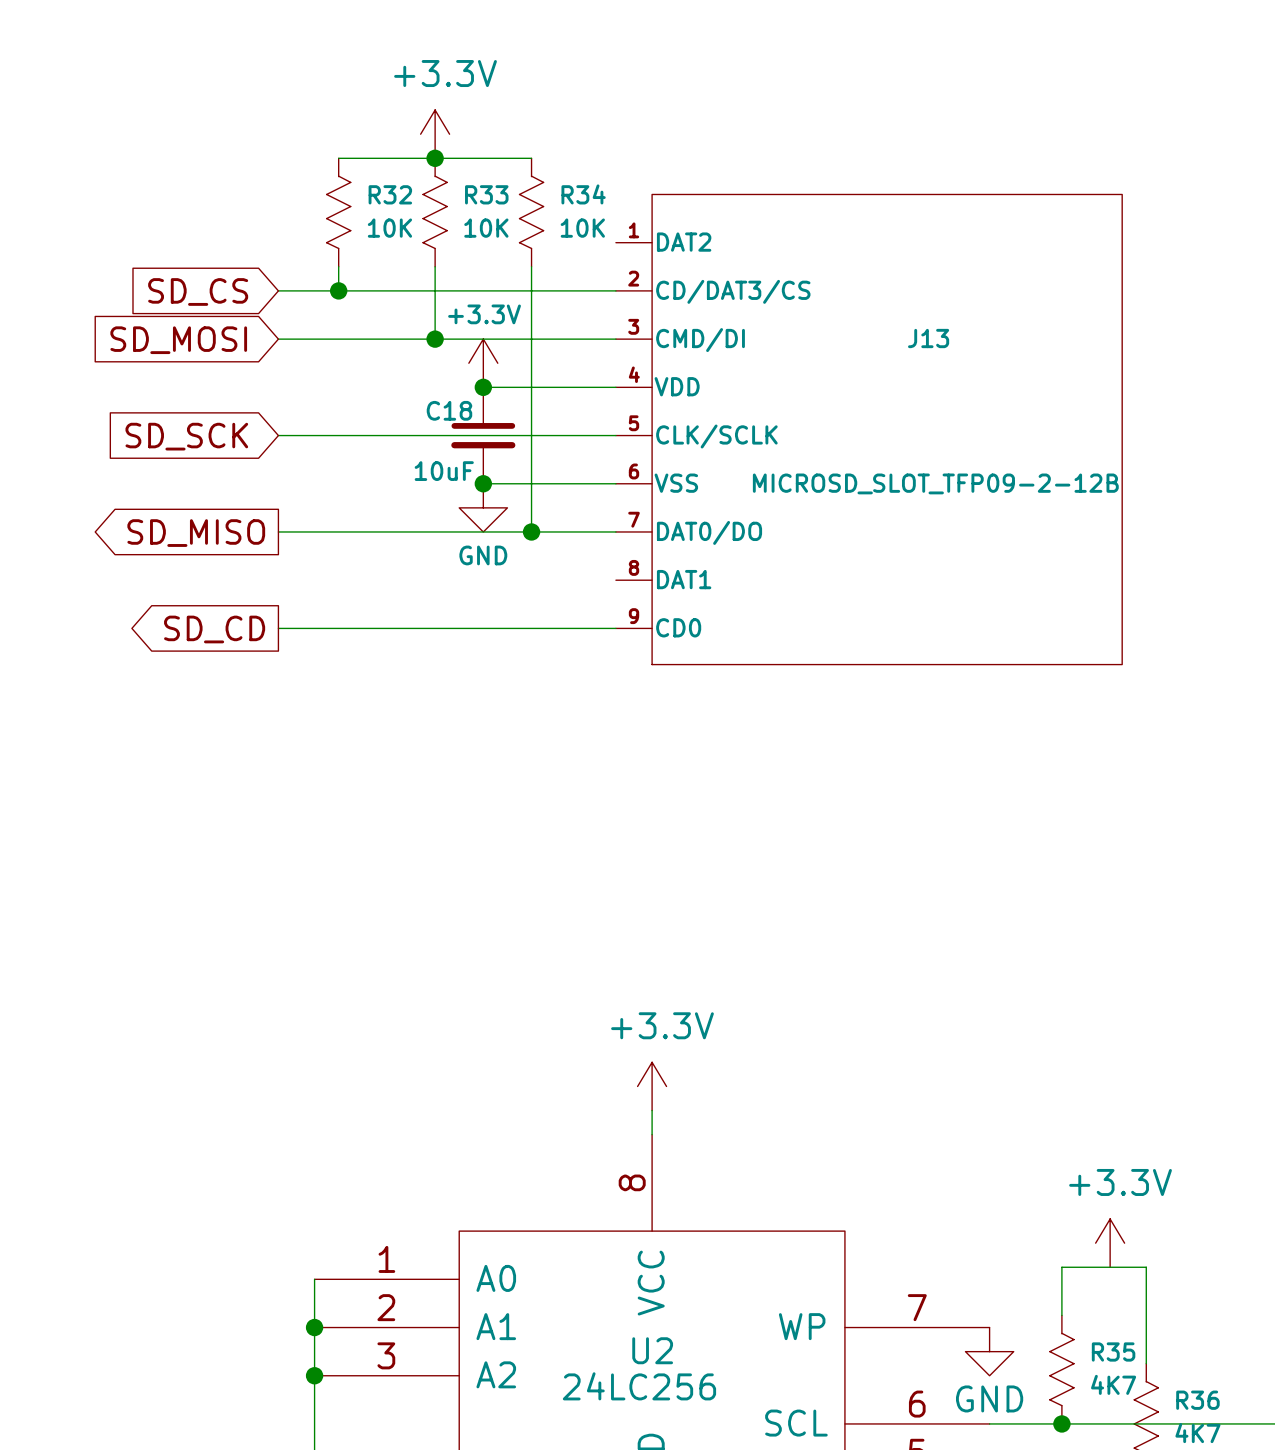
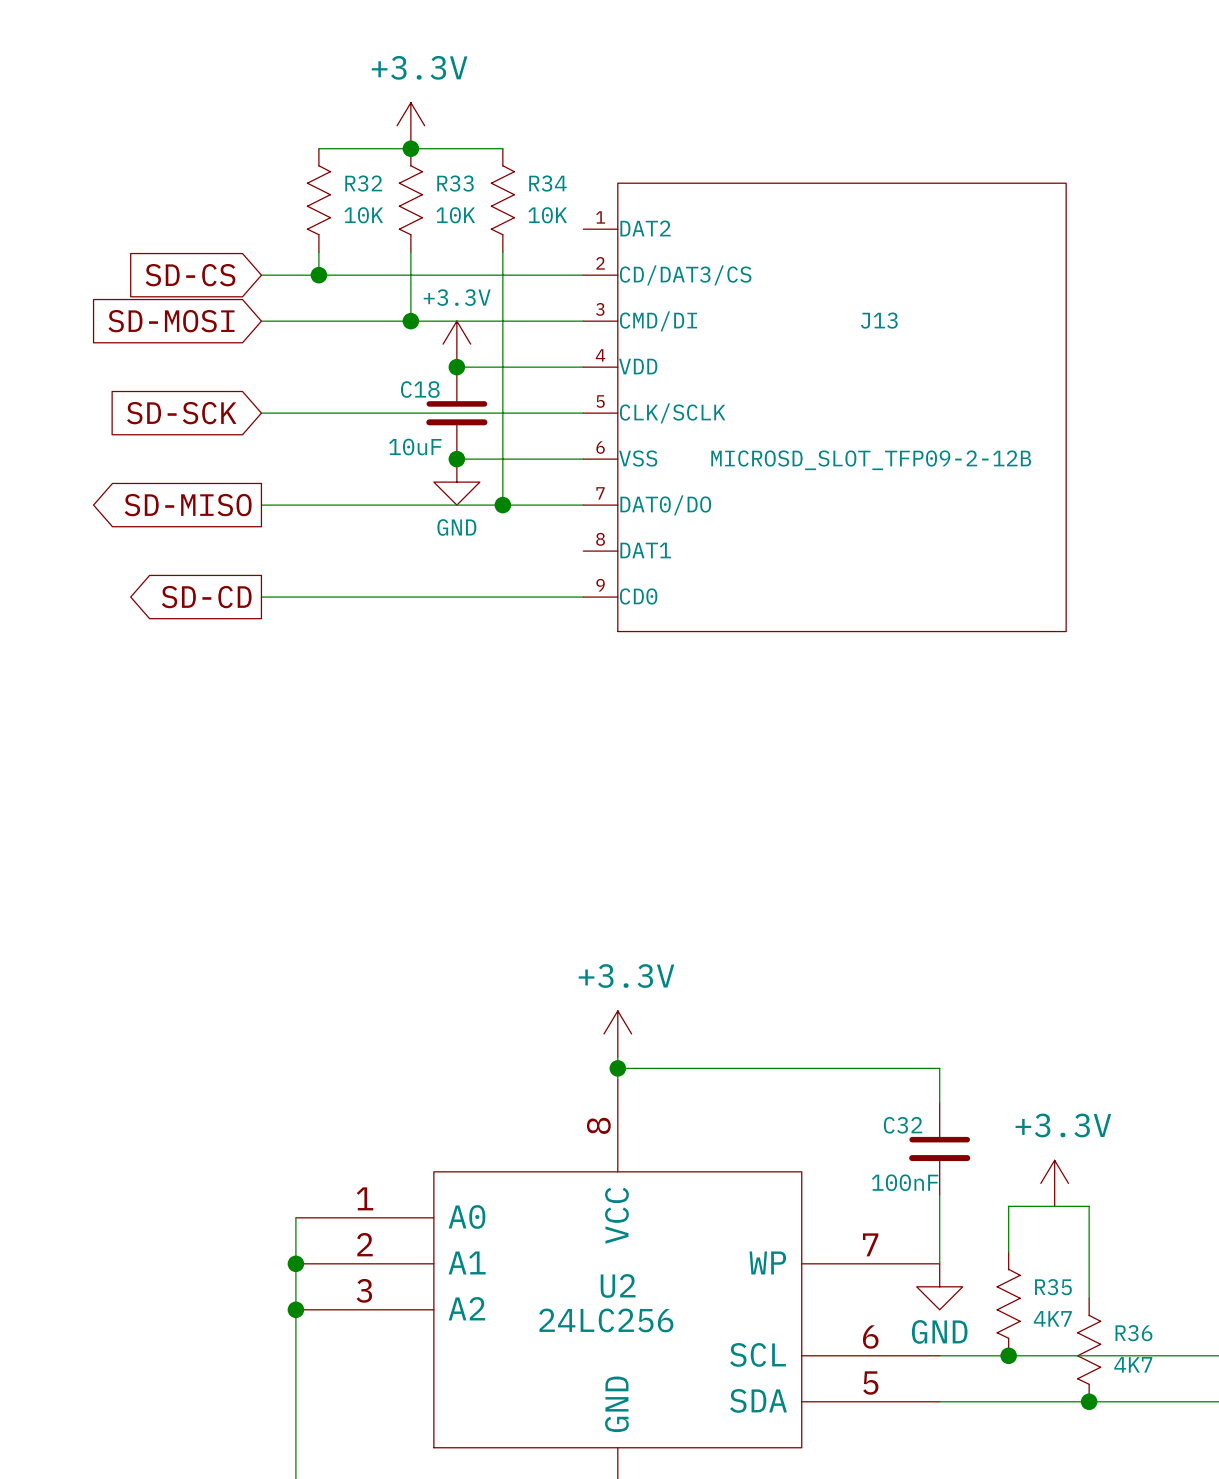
global label: SD_CS (198, 291) -> SD-CS (190, 275)
global label: SD_MOSI (178, 340) -> SD-MOSI (171, 321)
global label: SD_SCK (186, 436) -> SD-SCK (181, 413)
global label: SD_MISO (196, 533) -> SD-MISO (188, 505)
global label: SD_CD (214, 629) -> SD-CD (206, 597)
wire: none -> (617, 1068) (939, 1068) (939, 1102)
junction: none -> (617, 1068)
C32: none -> 100nF (939, 1148)
wire: none -> (939, 1194) (939, 1263)

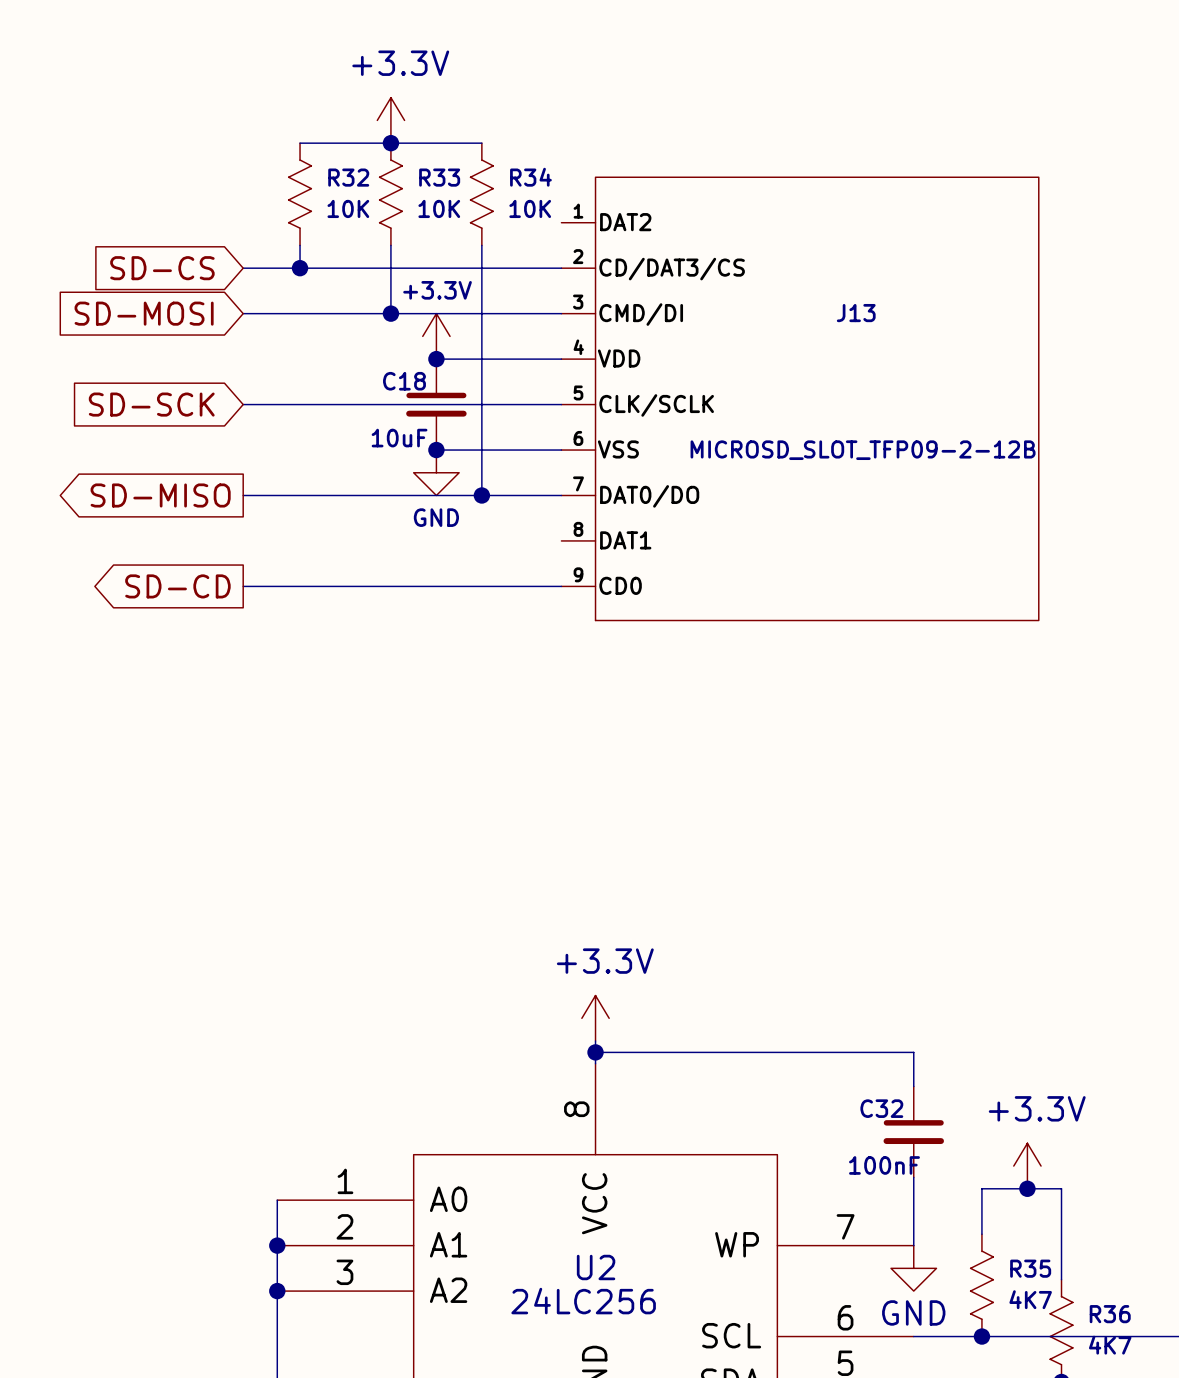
junction: none -> (1027, 1188)

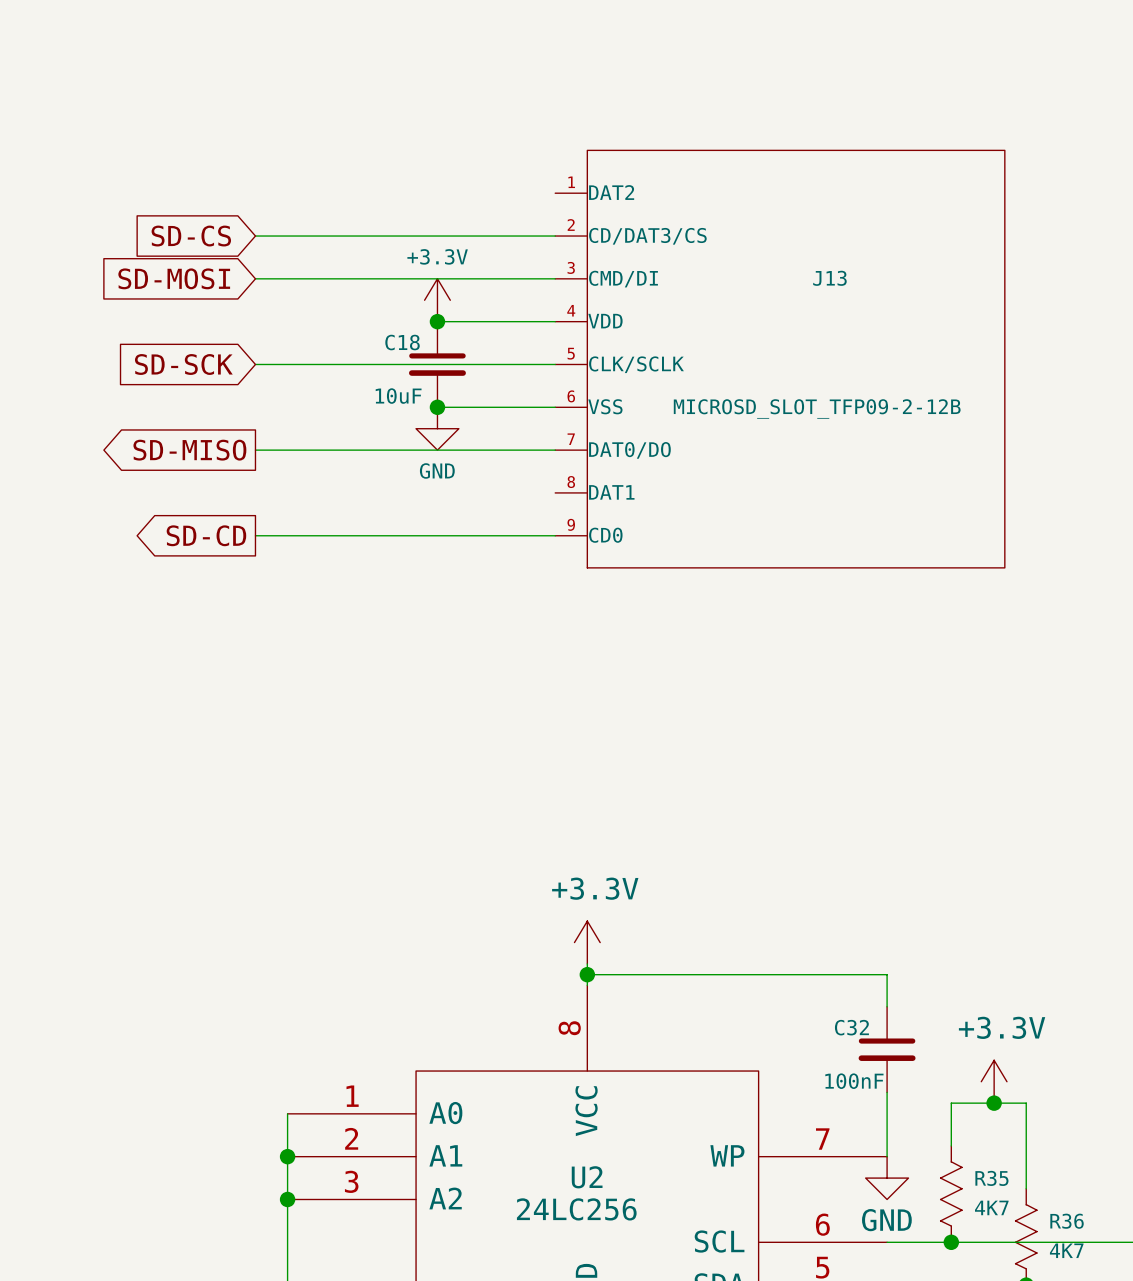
power symbol: +3.3V (390, 120) -> none
wire: (300, 143) (481, 143) -> none
junction: (390, 143) -> none
R32: 10K (300, 194) -> none
R33: 10K (390, 194) -> none
R34: 10K (481, 194) -> none
wire: (300, 245) (300, 268) -> none
wire: (390, 245) (390, 313) -> none
wire: (481, 245) (481, 495) -> none
junction: (300, 268) -> none
junction: (390, 313) -> none
junction: (481, 495) -> none

